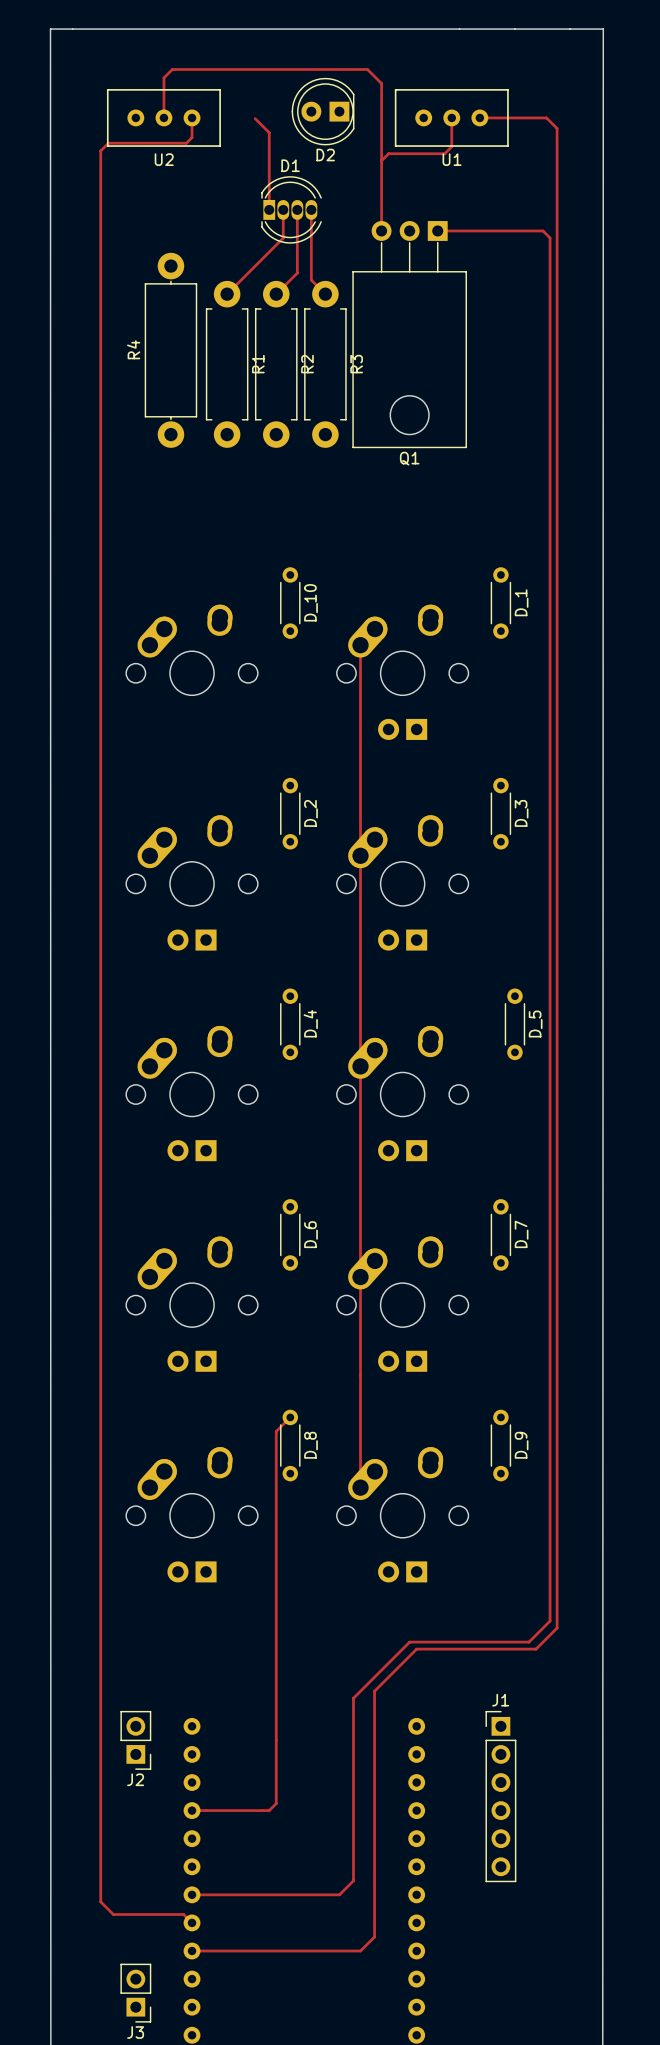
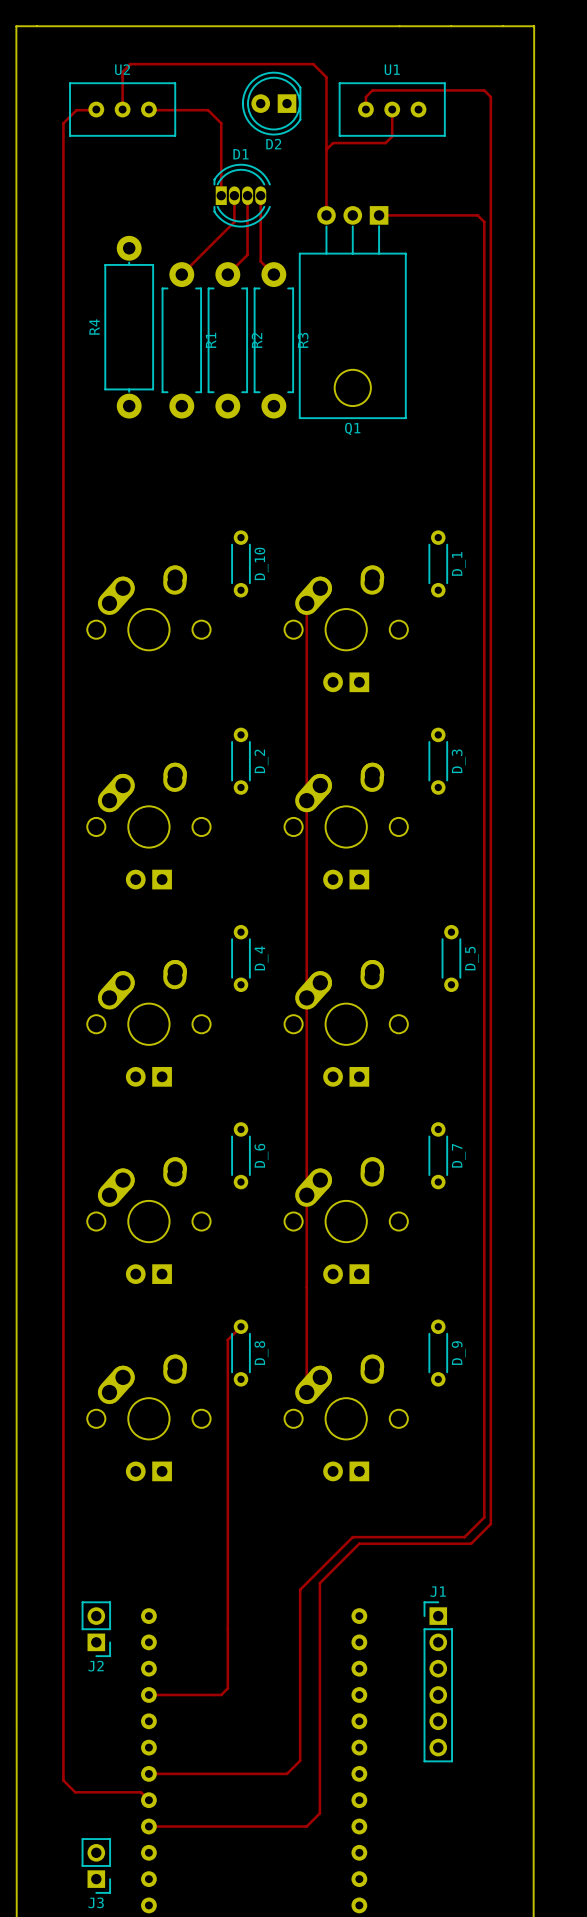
track: (192, 117) (192, 137) (186, 143) (108, 143) (100, 150) -> (96, 110) (76, 110) (63, 123) (63, 140)
track: (479, 117) (546, 117) (557, 128) -> (365, 110) (365, 97) (372, 90) (484, 90) (490, 97) (490, 119)
track: none -> (148, 110) (208, 110)
U2 name position: U2 (164, 159) -> U2 (122, 69)
U1 name position: U1 (452, 159) -> U1 (392, 69)

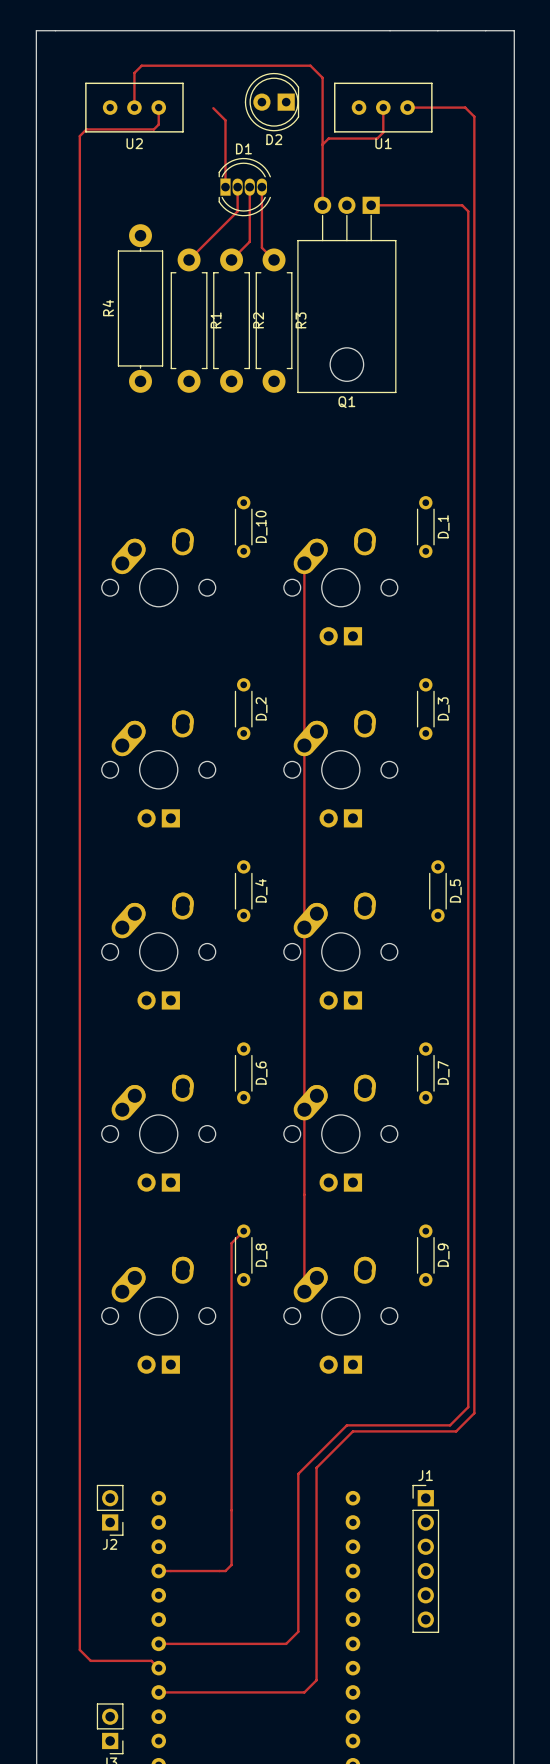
U2 name position: U2 (122, 69) -> U2 (134, 143)
U1 name position: U1 (392, 69) -> U1 (383, 143)
track: (96, 110) (76, 110) (63, 123) (63, 140) -> (158, 107) (158, 124) (153, 129) (86, 129) (79, 136)
track: (148, 110) (208, 110) -> none
track: (365, 110) (365, 97) (372, 90) (484, 90) (490, 97) (490, 119) -> (407, 107) (465, 107) (474, 116)

